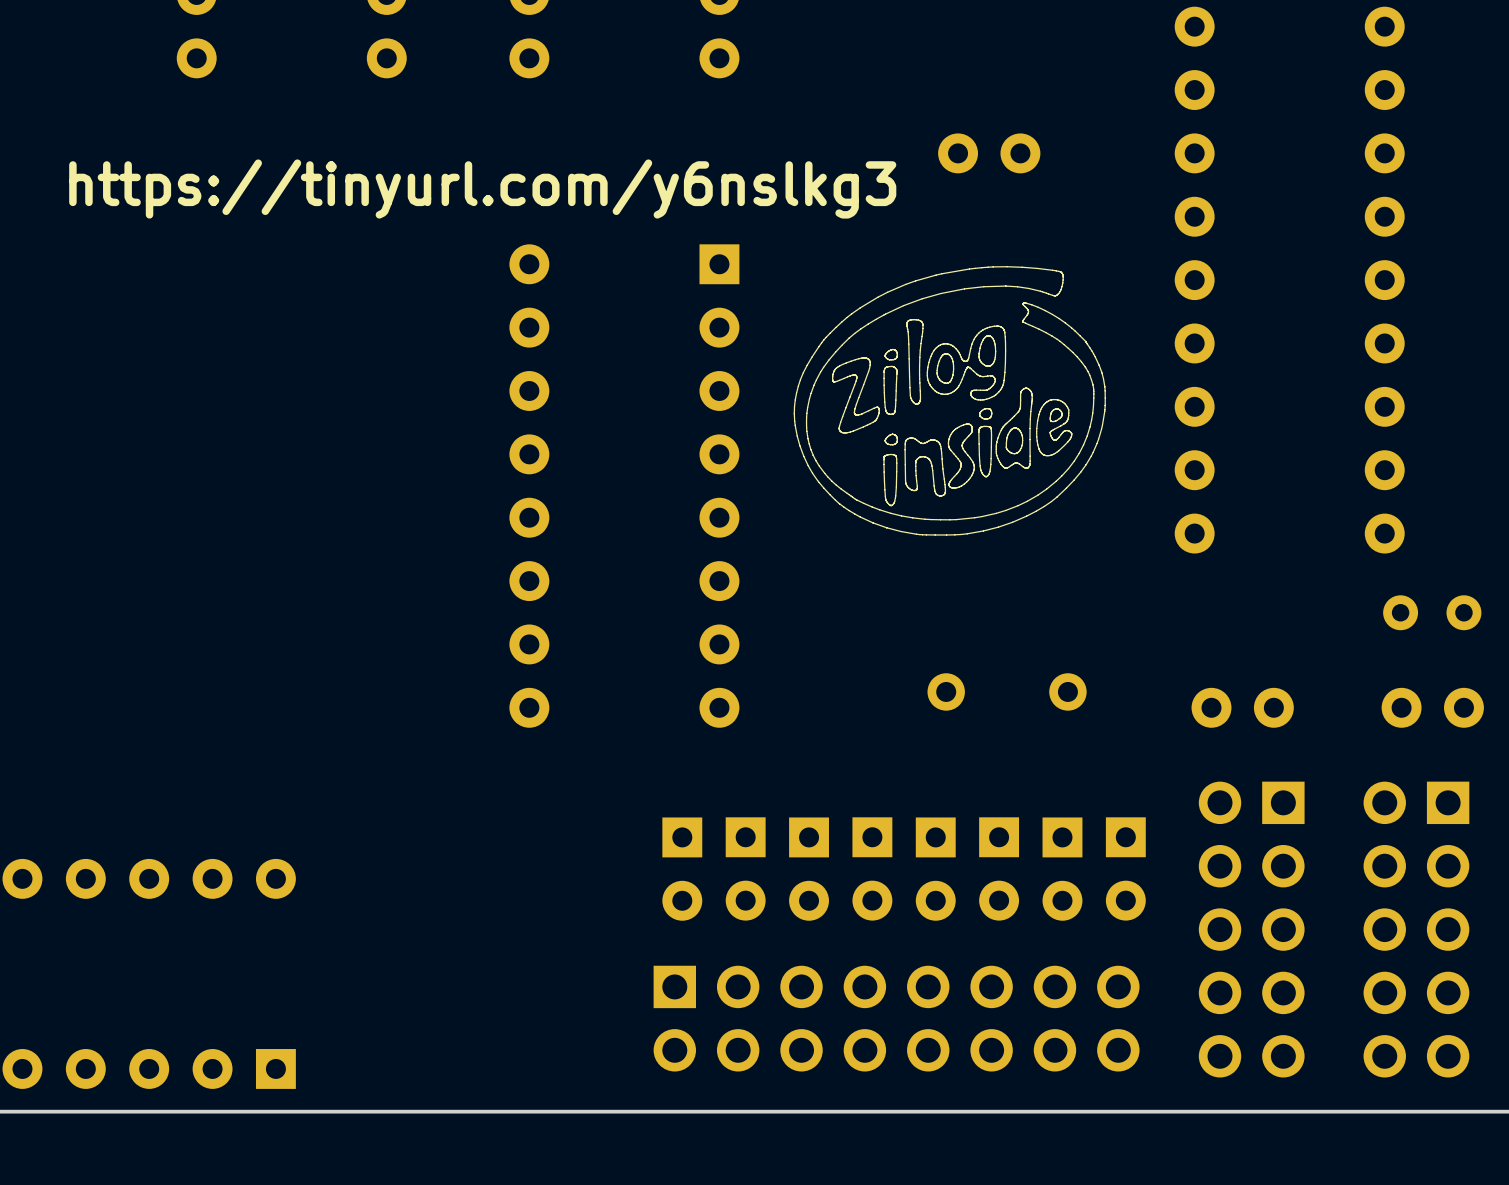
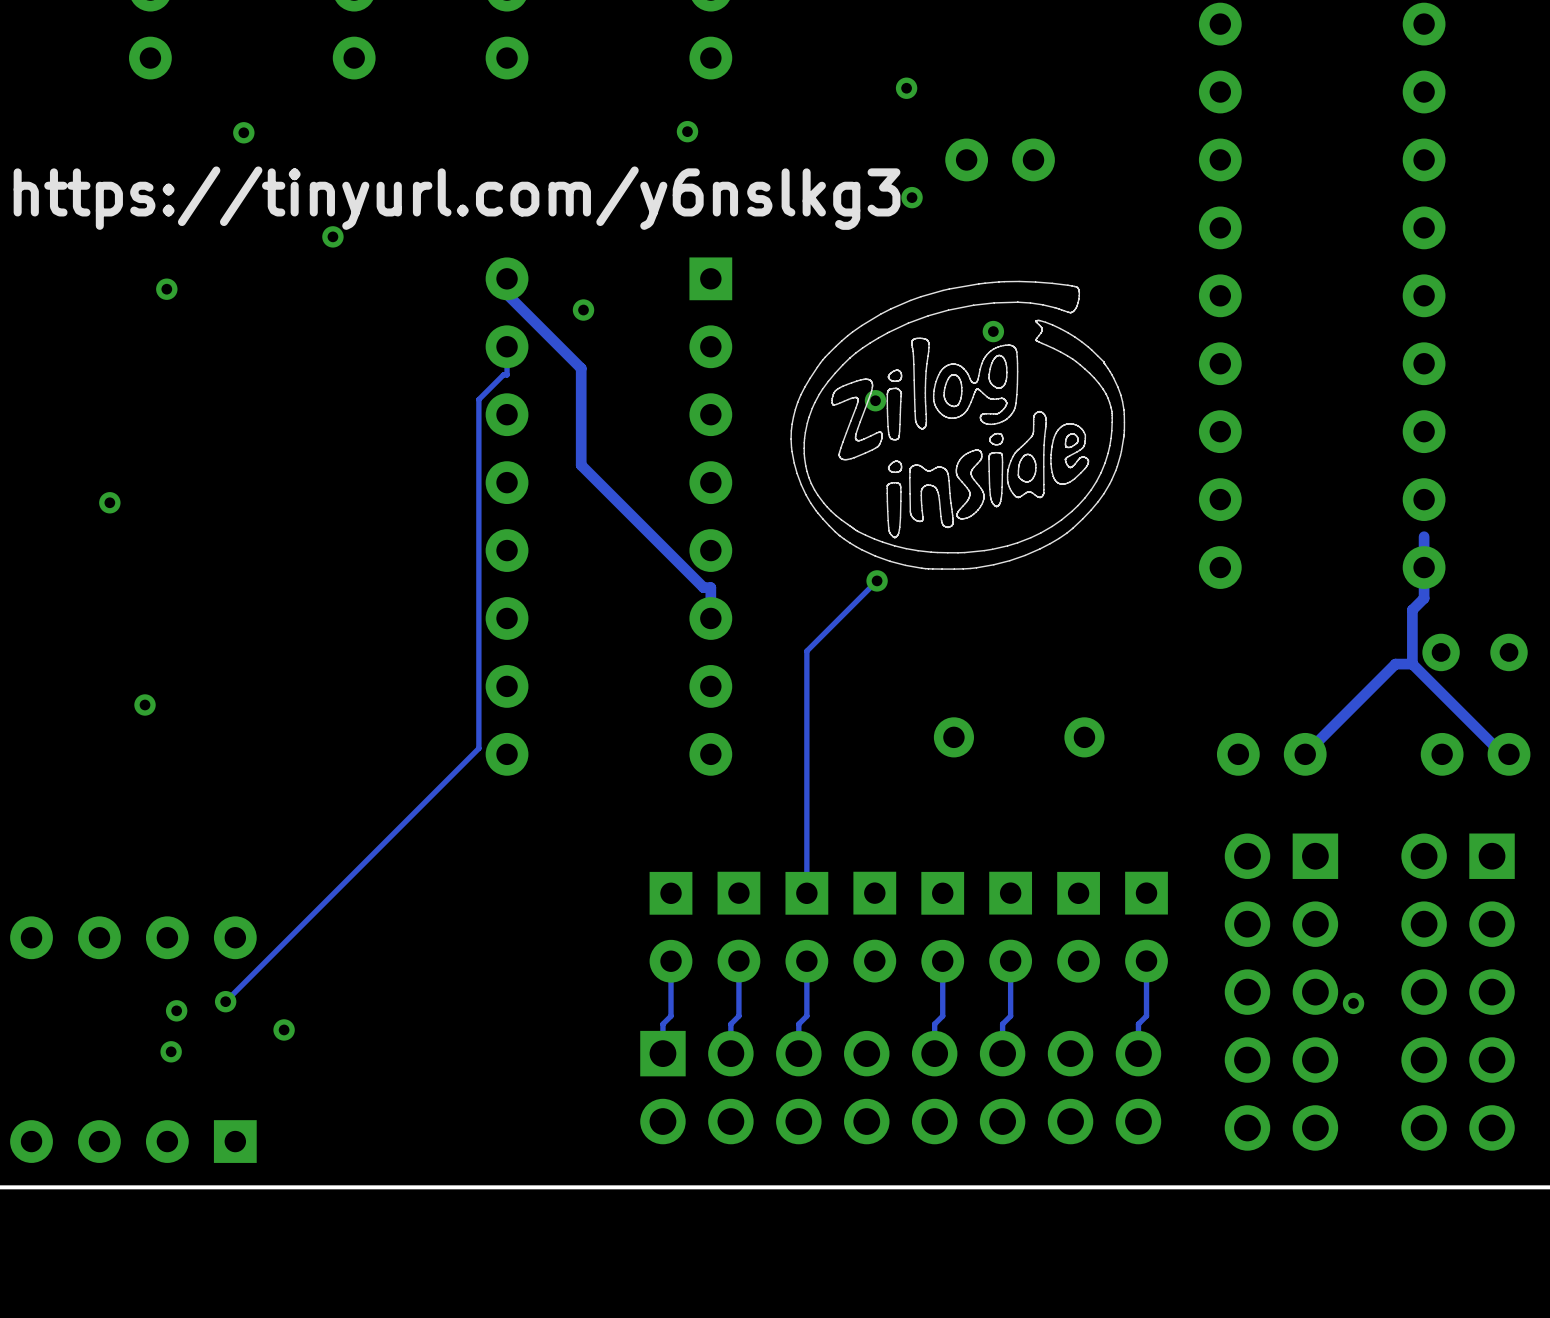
via: none -> (906, 88)
via: none -> (687, 131)
via: none -> (243, 132)
via: none -> (912, 197)
via: none -> (332, 236)
via: none -> (166, 289)
track: none -> (507, 294) (581, 368) (581, 465) (703, 587) (710, 587) (710, 618)
via: none -> (583, 310)
via: none -> (993, 331)
track: none -> (507, 346) (507, 374) (503, 374) (478, 399) (478, 748) (225, 1001)
via: none -> (875, 400)
via: none -> (109, 502)
track: none -> (1424, 536) (1424, 598) (1412, 610) (1412, 664)
track: none -> (877, 580) (806, 651) (806, 893)
via: none -> (877, 580)
track: none -> (1412, 664) (1395, 664) (1305, 754)
track: none -> (1412, 664) (1502, 754) (1509, 754)
via: none -> (145, 704)
track: none -> (671, 961) (671, 1016) (662, 1024) (662, 1053)
track: none -> (738, 961) (738, 1016) (730, 1024) (730, 1053)
track: none -> (806, 961) (806, 1016) (798, 1024) (798, 1053)
track: none -> (942, 961) (942, 1016) (934, 1024) (934, 1053)
track: none -> (1010, 961) (1010, 1016) (1002, 1024) (1002, 1053)
track: none -> (1146, 961) (1146, 1016) (1138, 1024) (1138, 1053)
via: none -> (225, 1001)
via: none -> (1353, 1003)
via: none -> (176, 1010)
via: none -> (284, 1029)
via: none -> (171, 1051)

